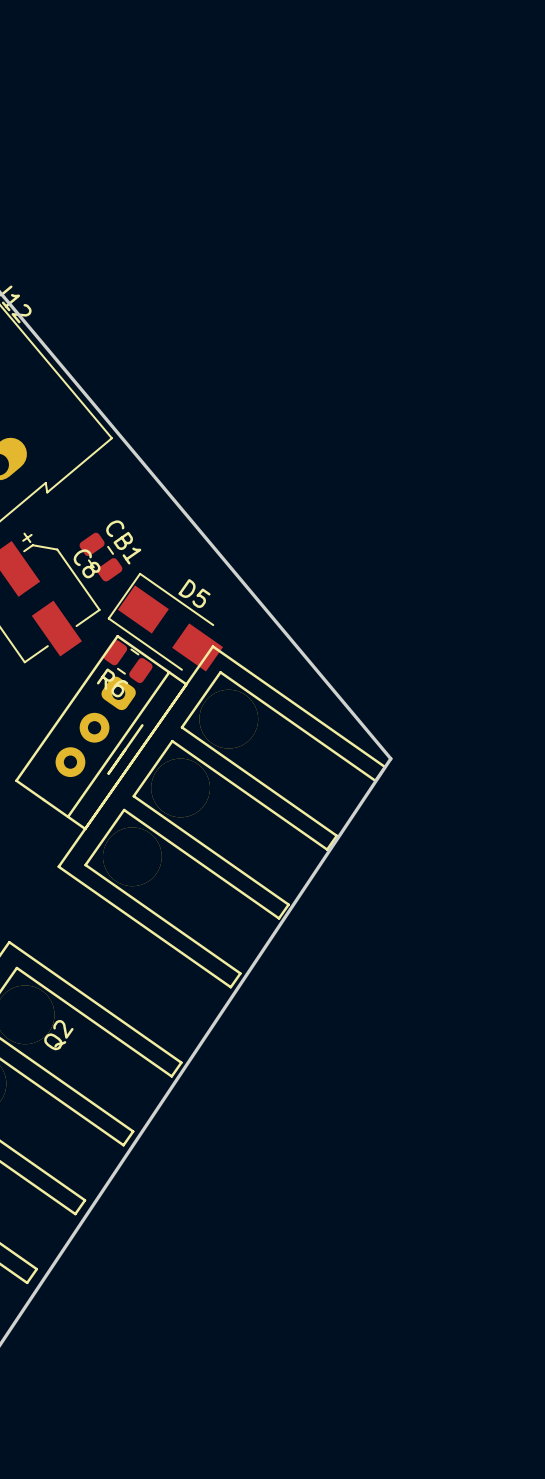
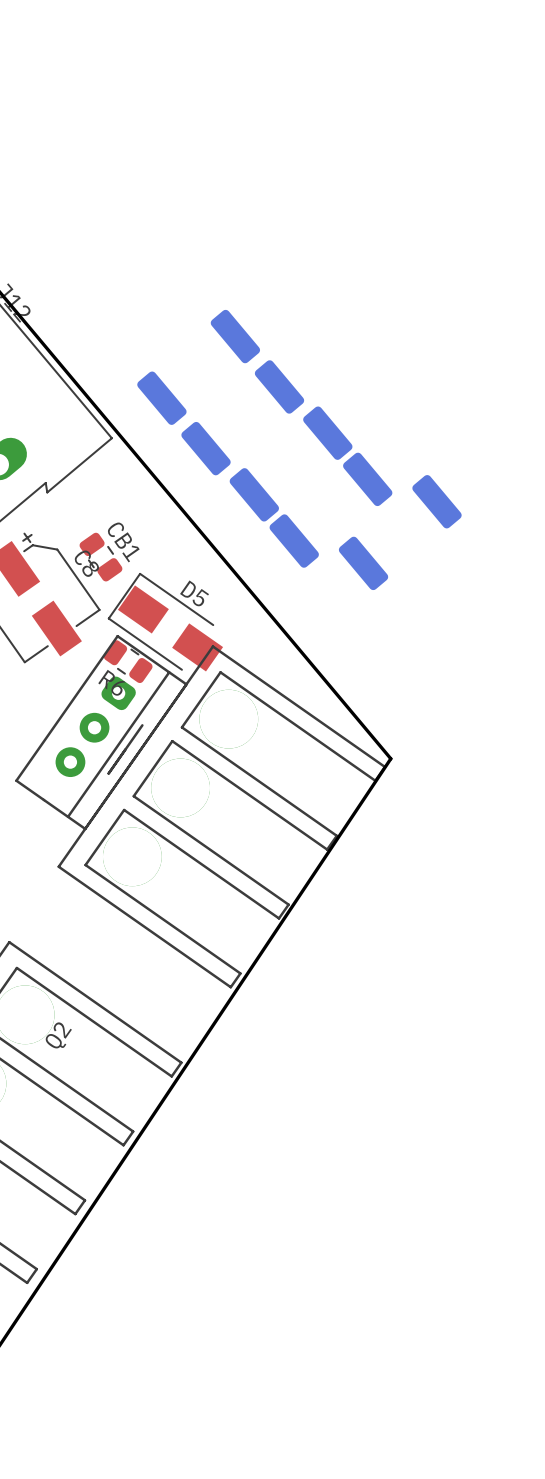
part: none -> (198, 367)
part: none -> (242, 417)
part: none -> (291, 464)
part: none -> (330, 510)
part: none -> (400, 532)

